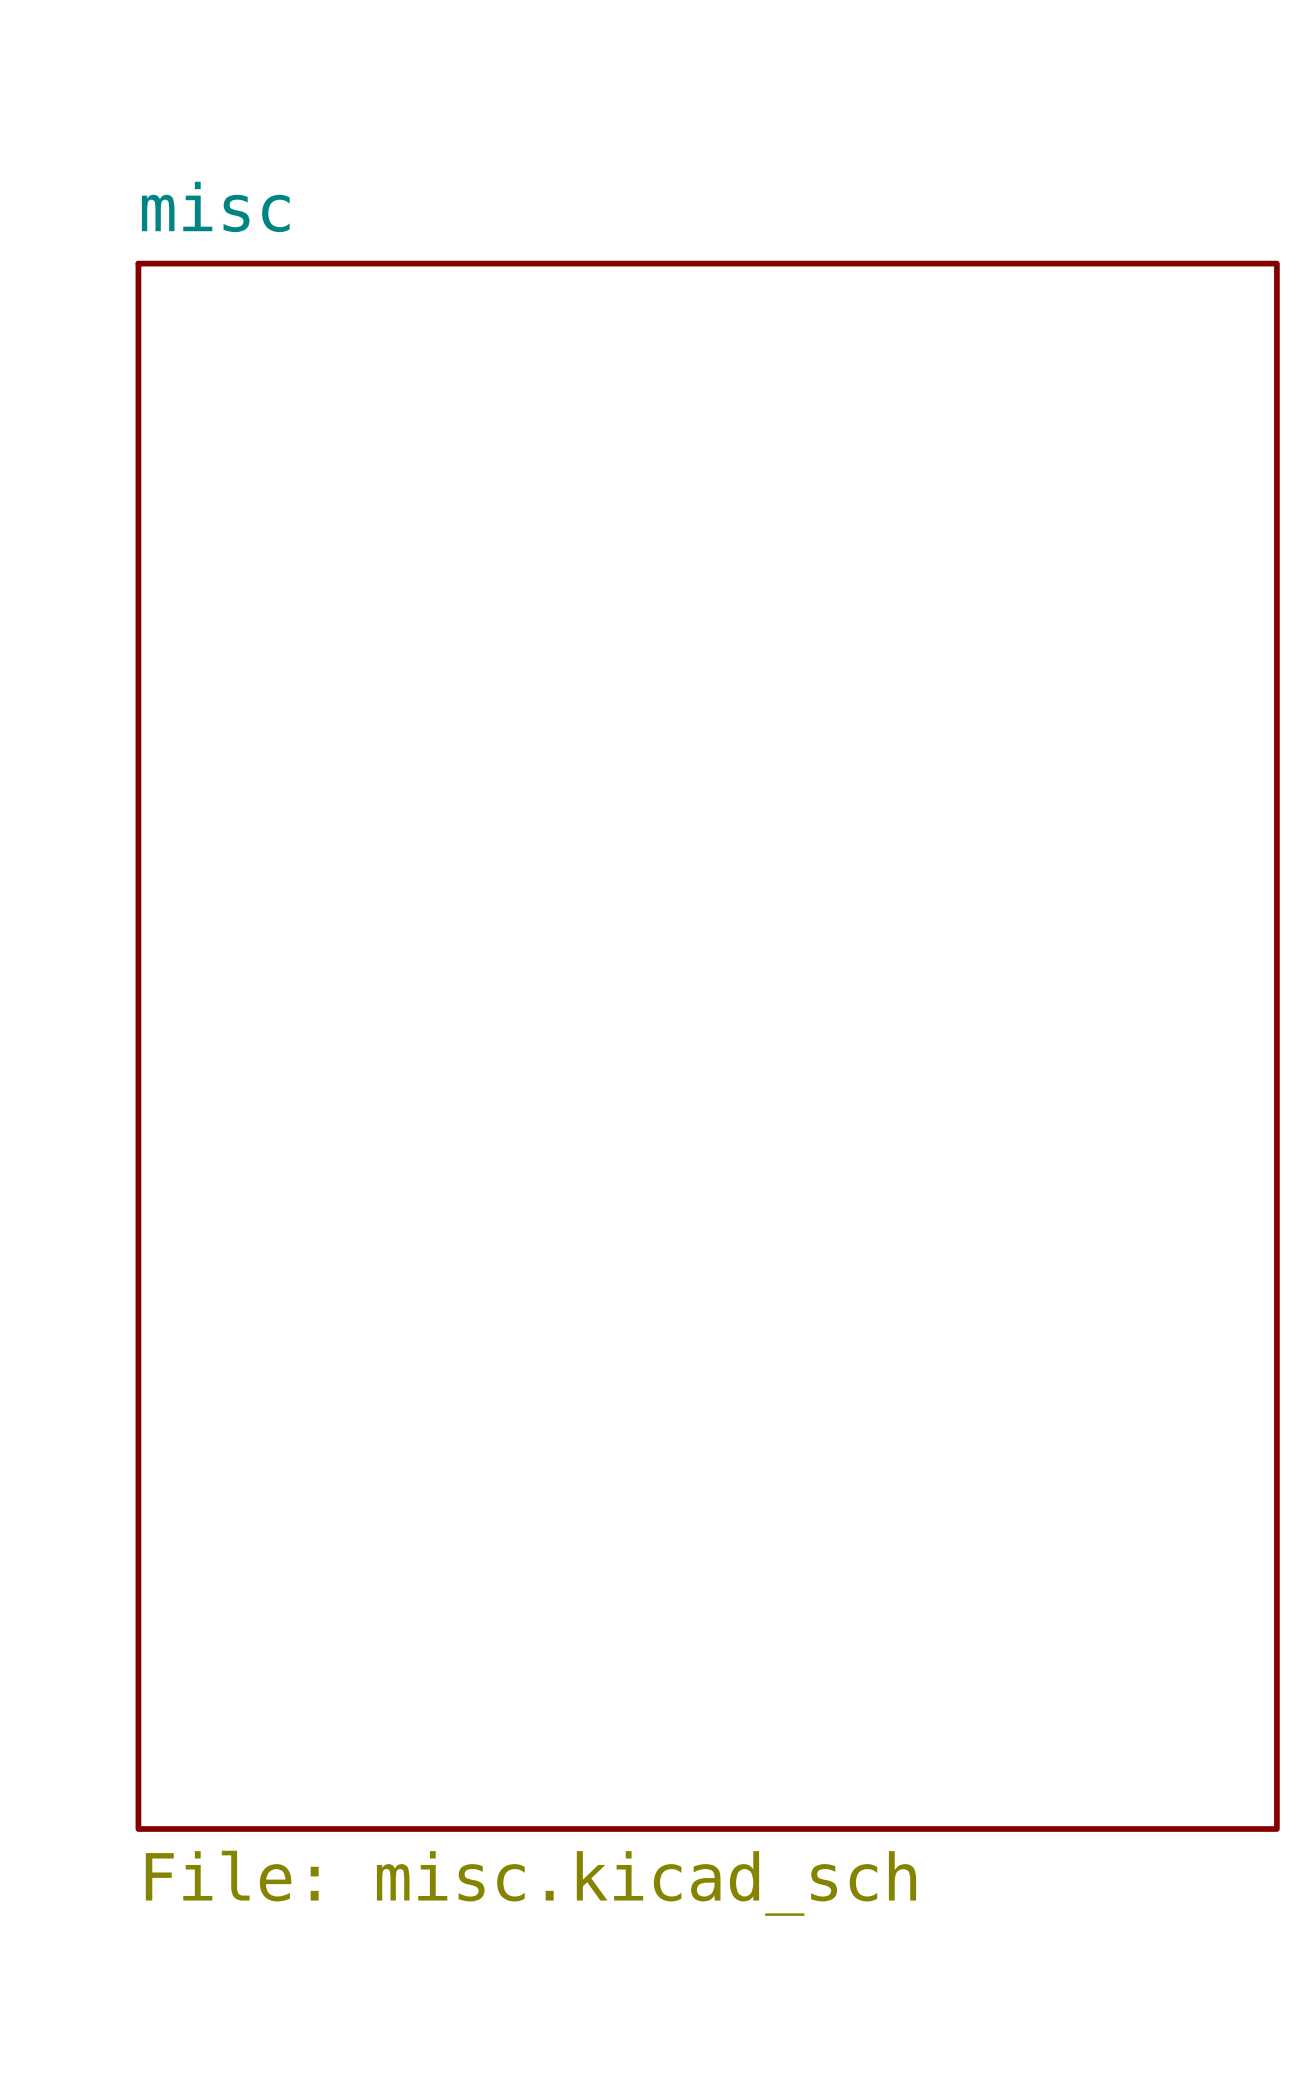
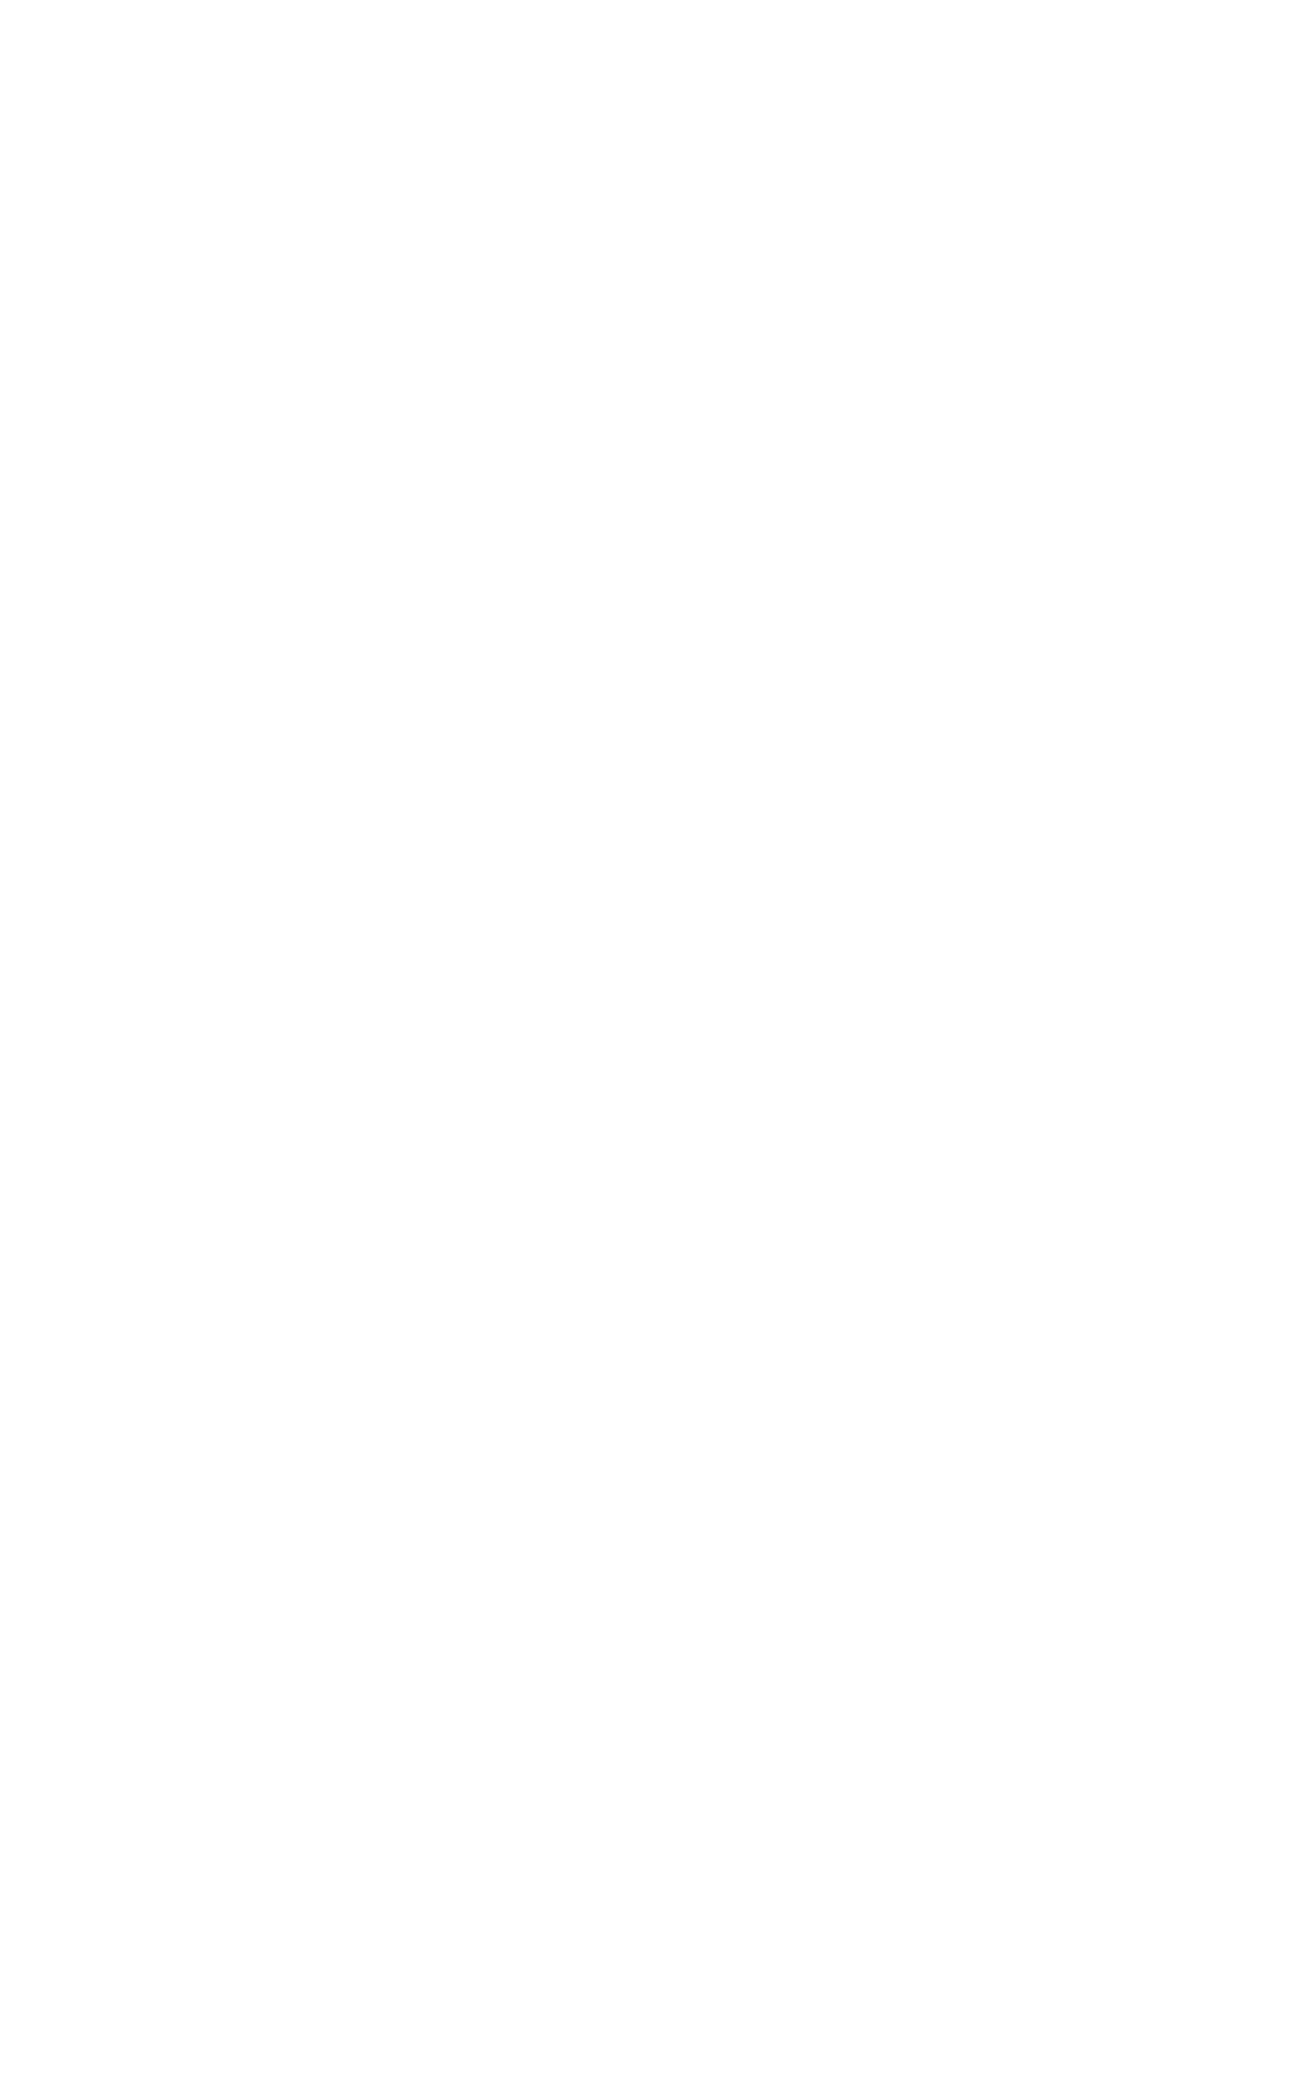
sheet misc: File: misc.kicad_sch (707, 1046) -> none

